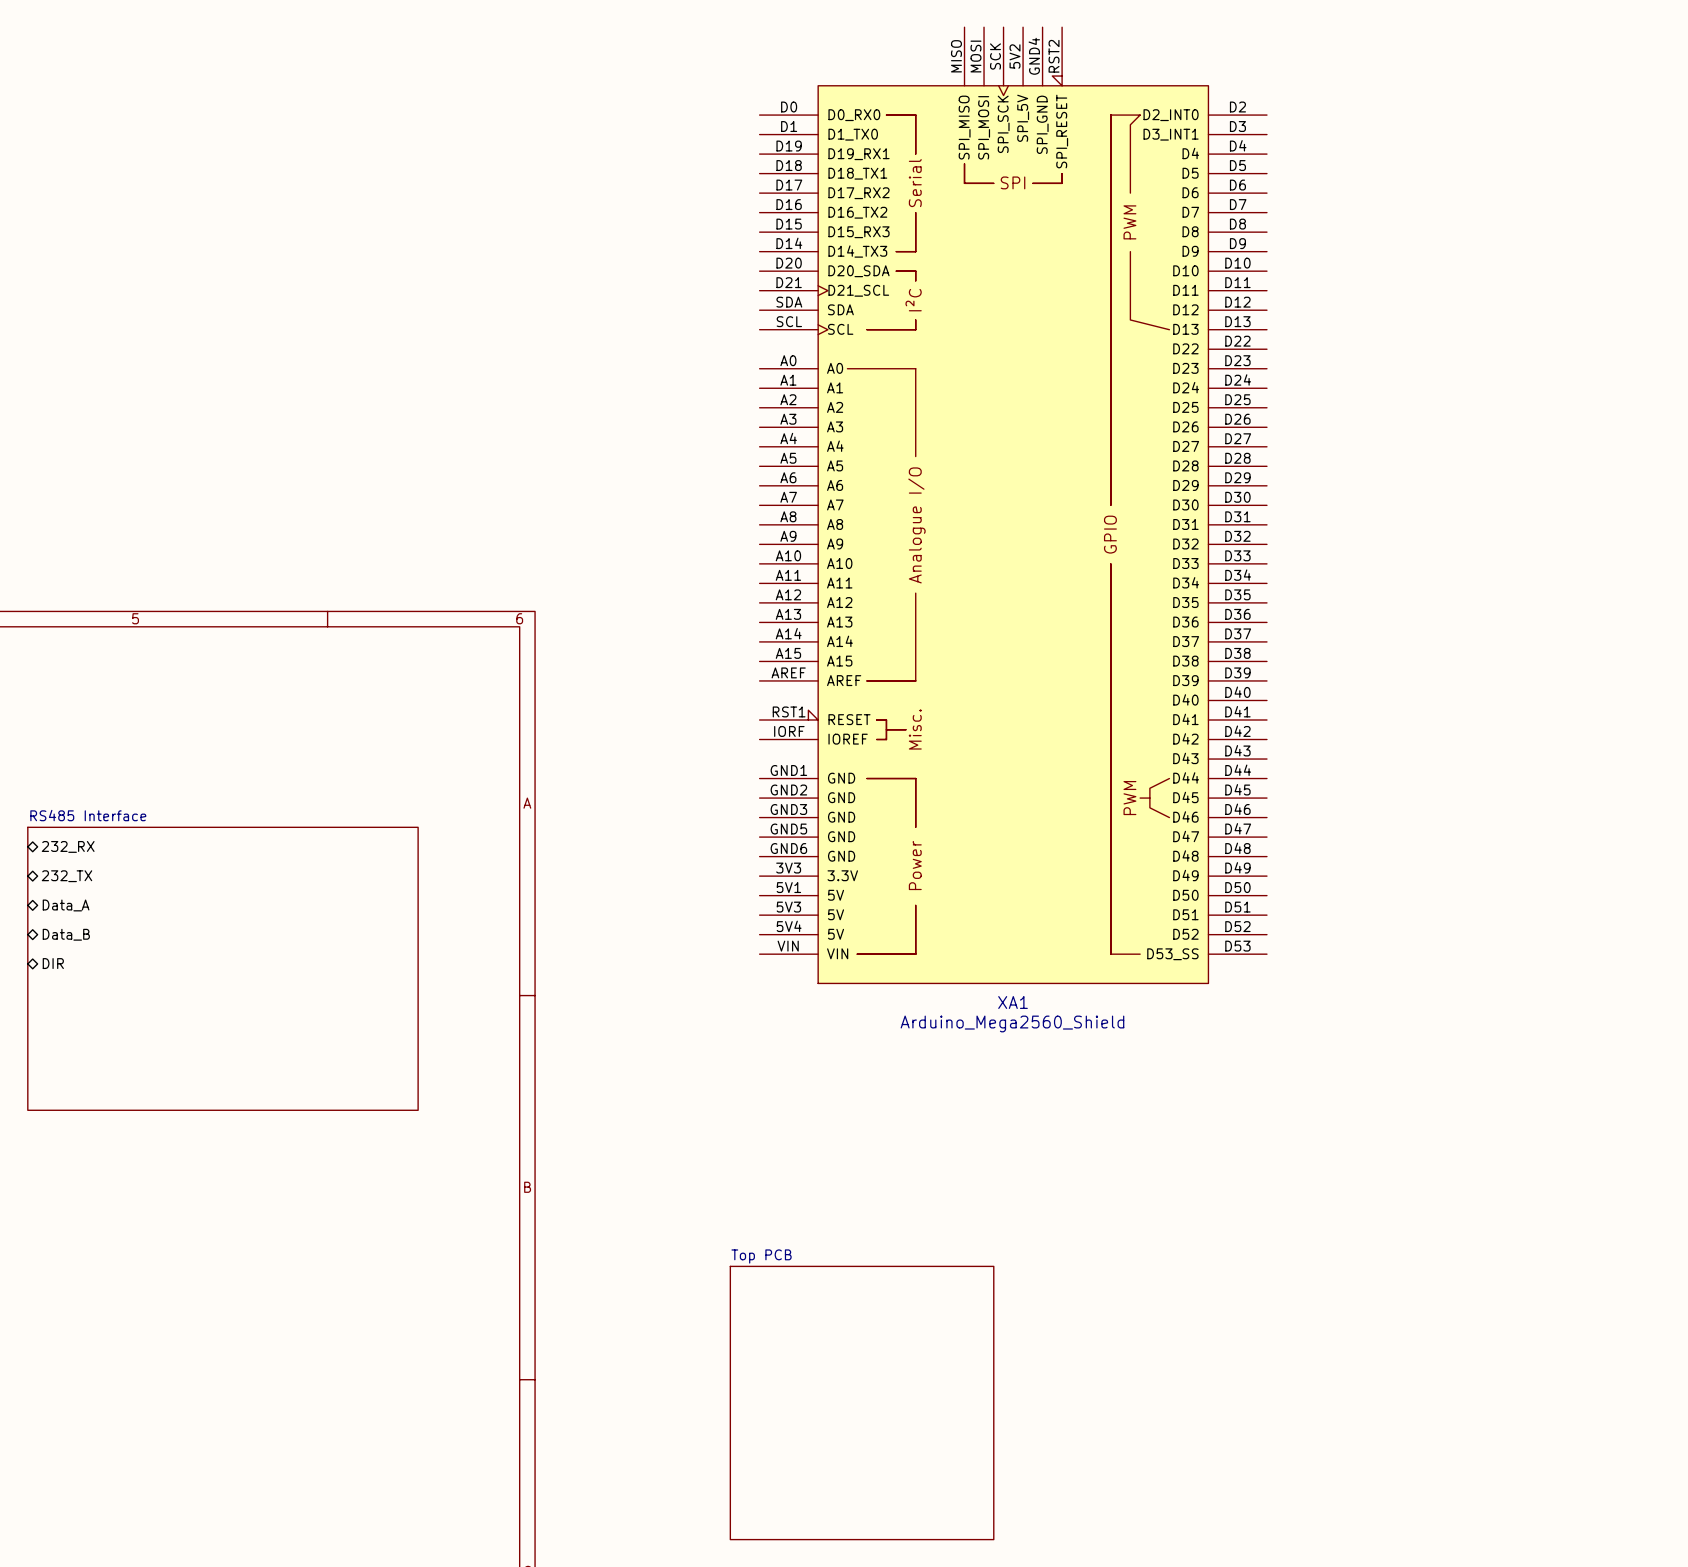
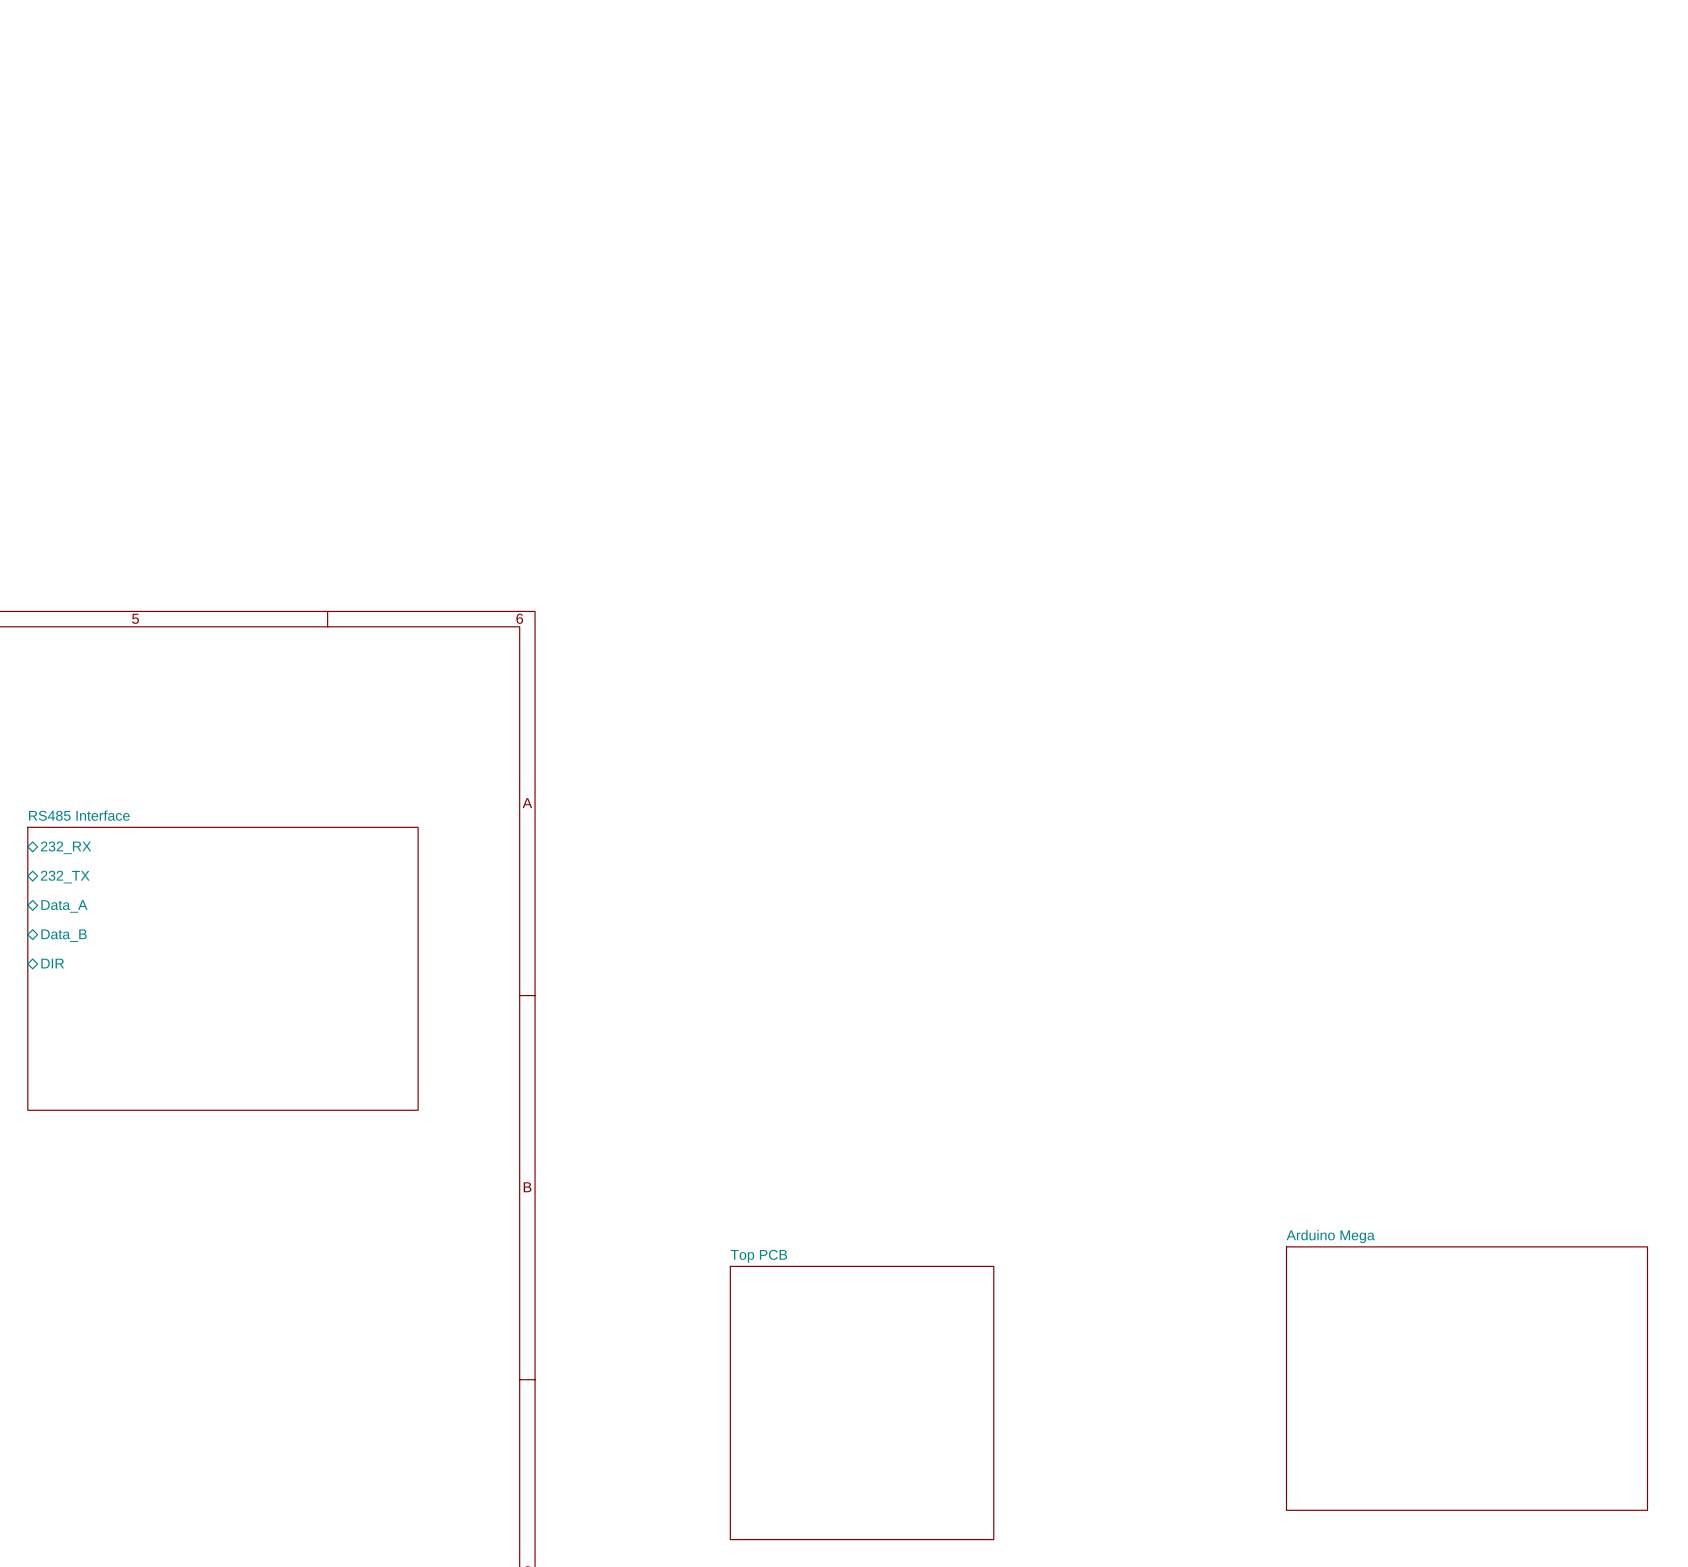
XA1: Arduino_Mega2560_Shield (1013, 505) -> none
sheet Arduino Mega: none -> (1467, 1378)

